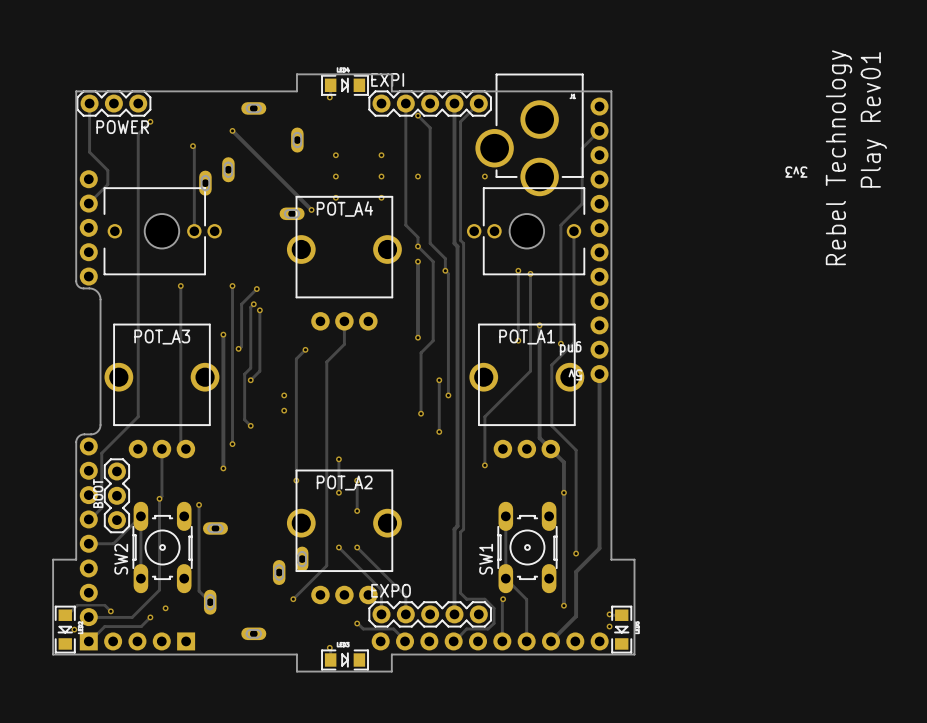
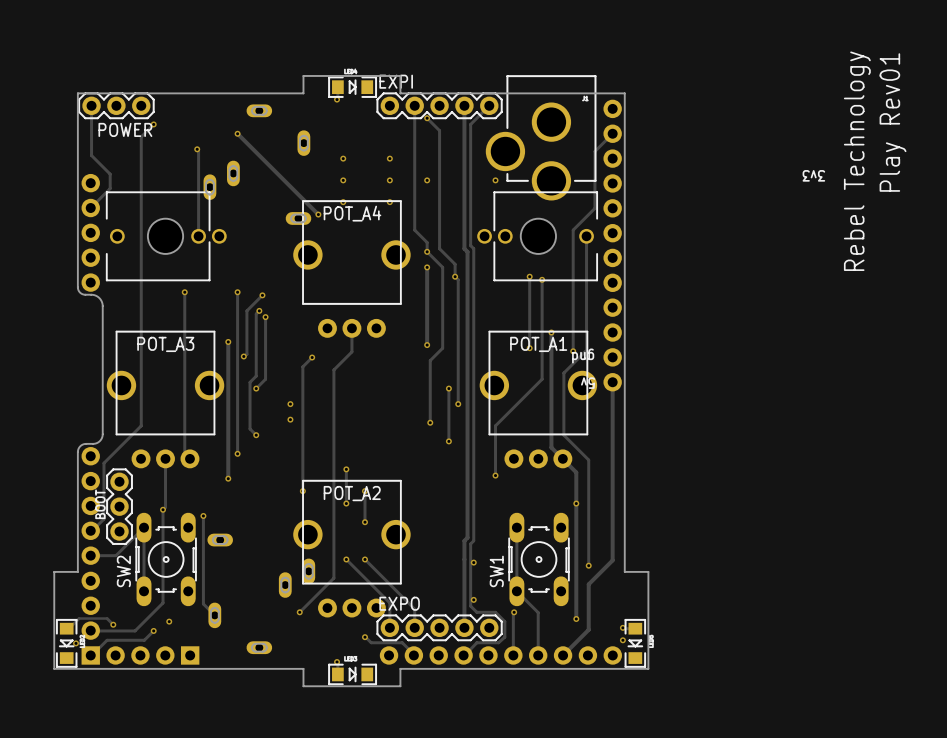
via: none -> (473, 562)
via: none -> (473, 599)

